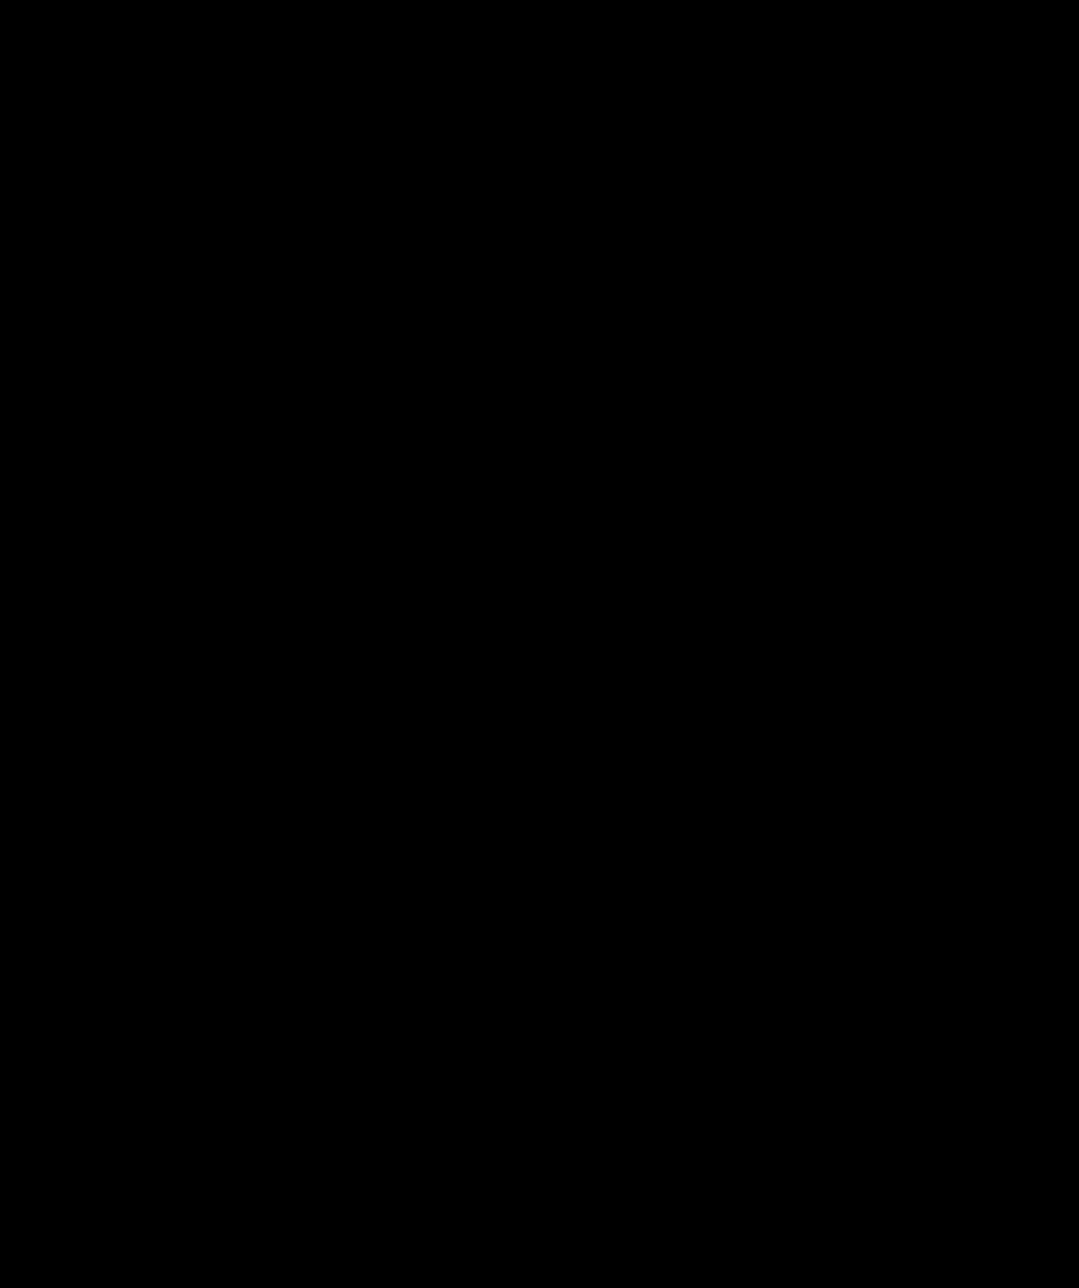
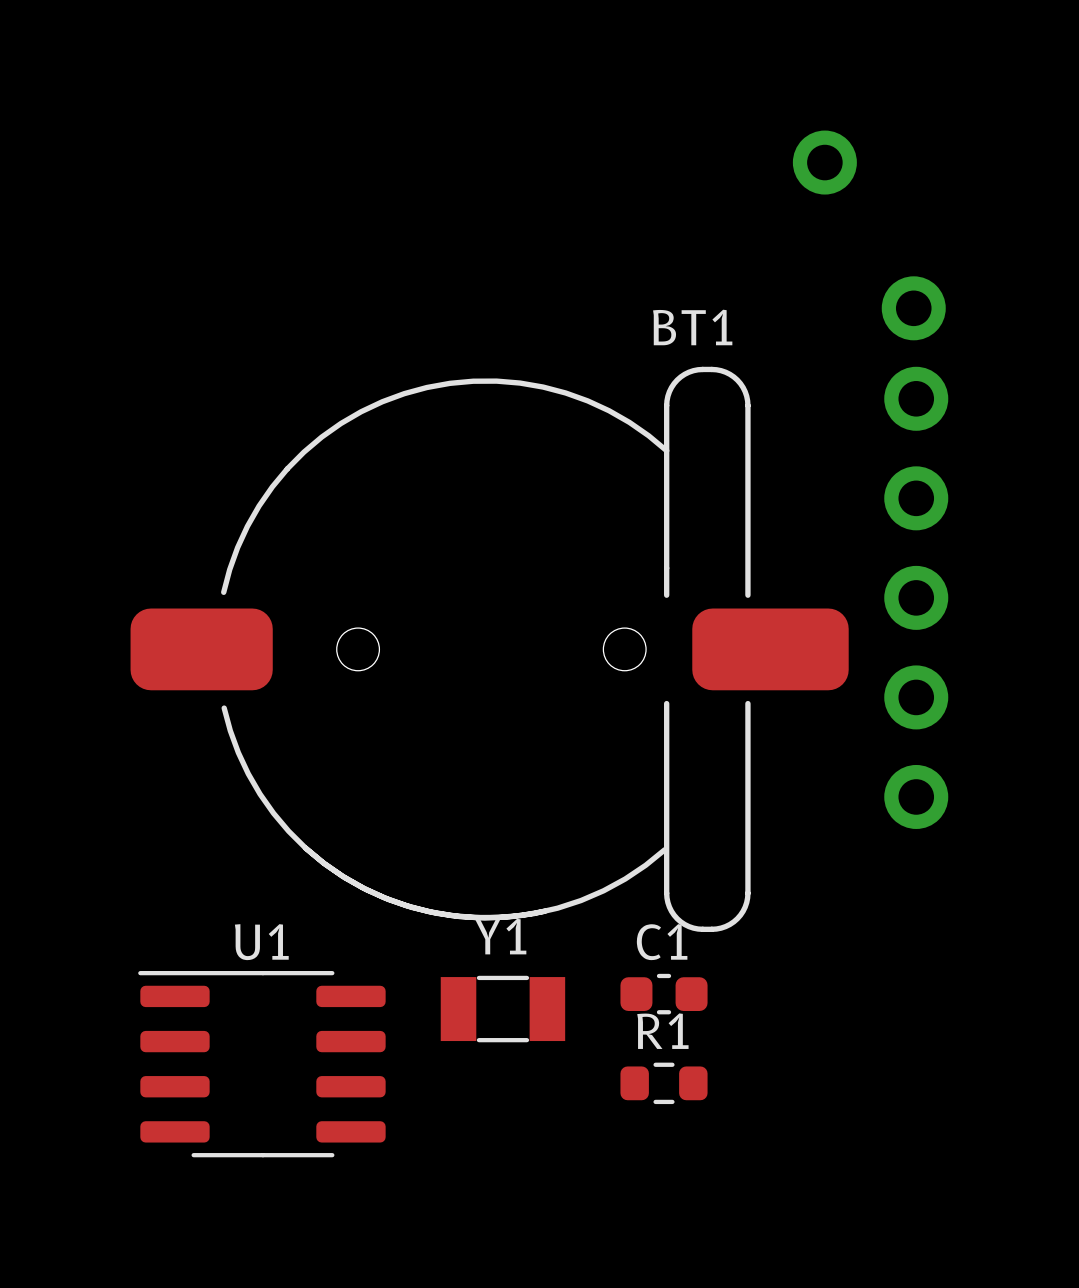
part: none -> (824, 162)
part: none -> (913, 308)
part: none -> (916, 398)
part: none -> (916, 498)
part: none -> (916, 597)
BT1: none -> (489, 649)
part: none -> (916, 697)
part: none -> (916, 796)
C1: none -> (664, 994)
Y1: none -> (502, 1009)
U1: none -> (261, 1064)
R1: none -> (664, 1083)

